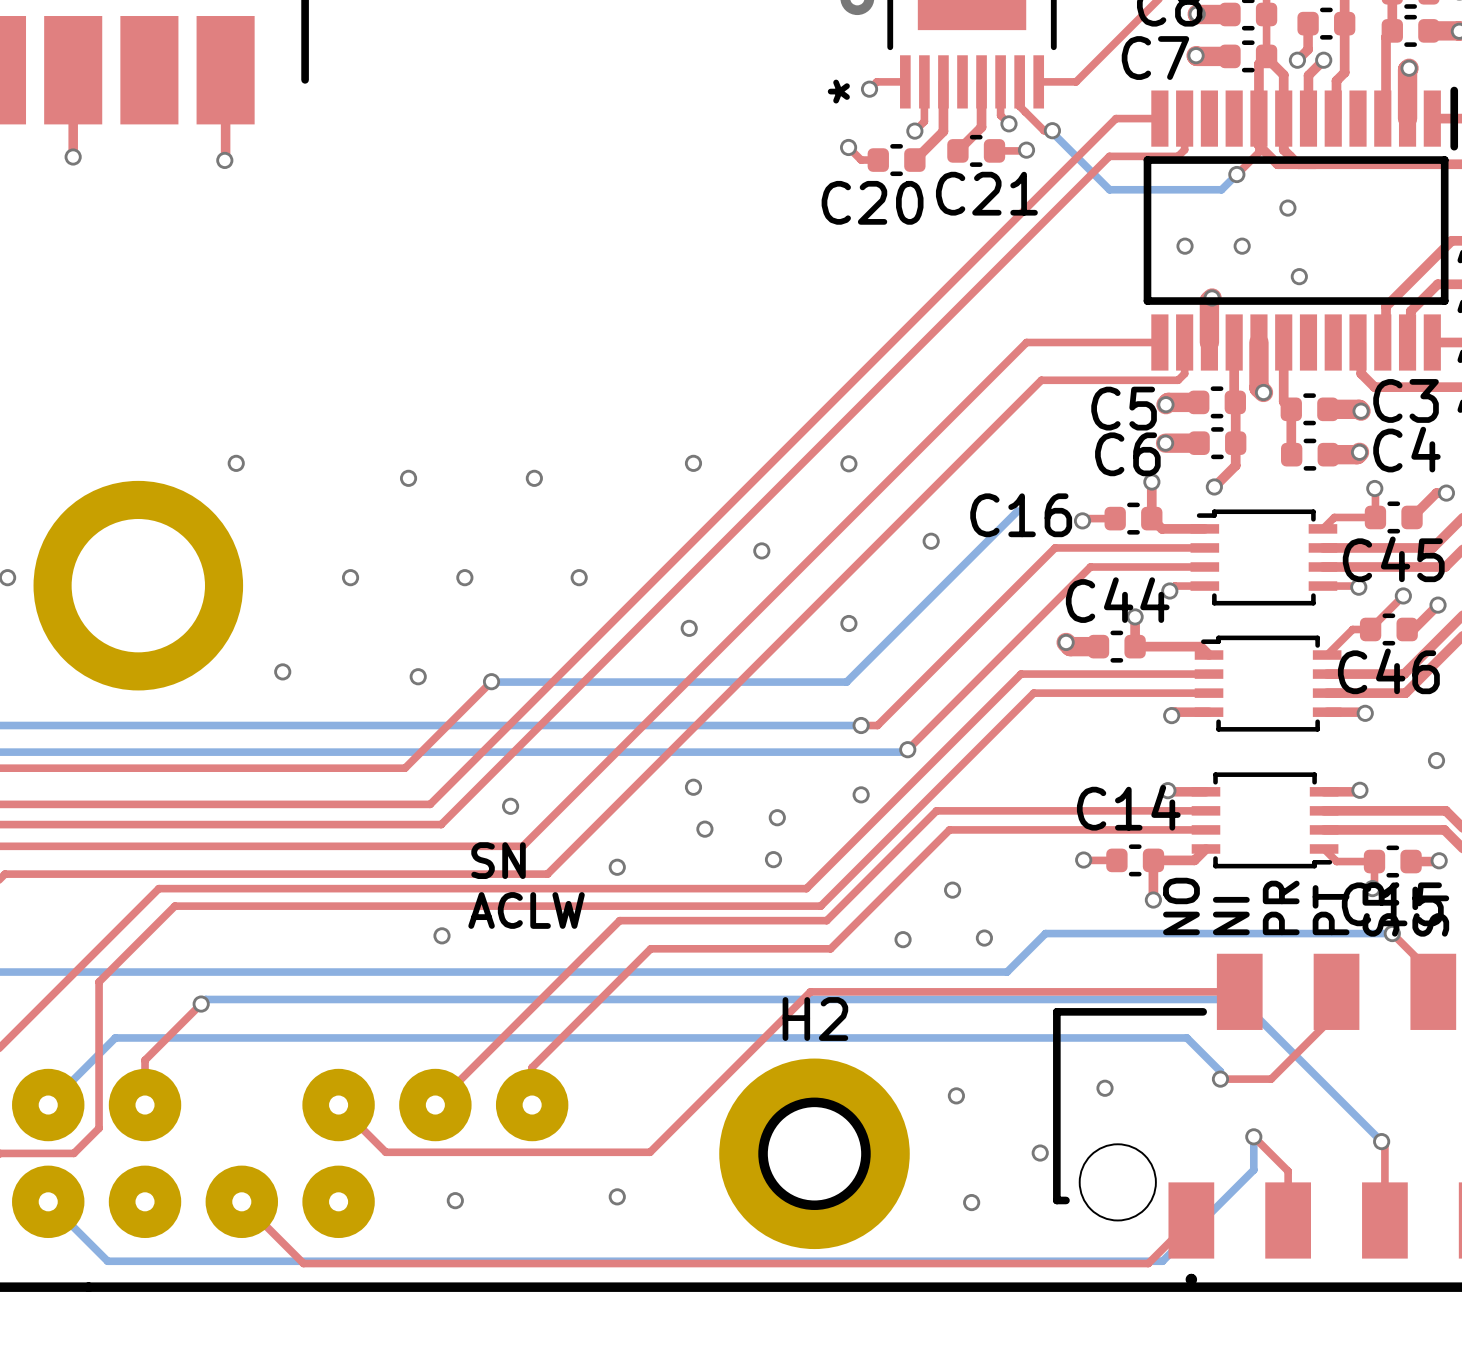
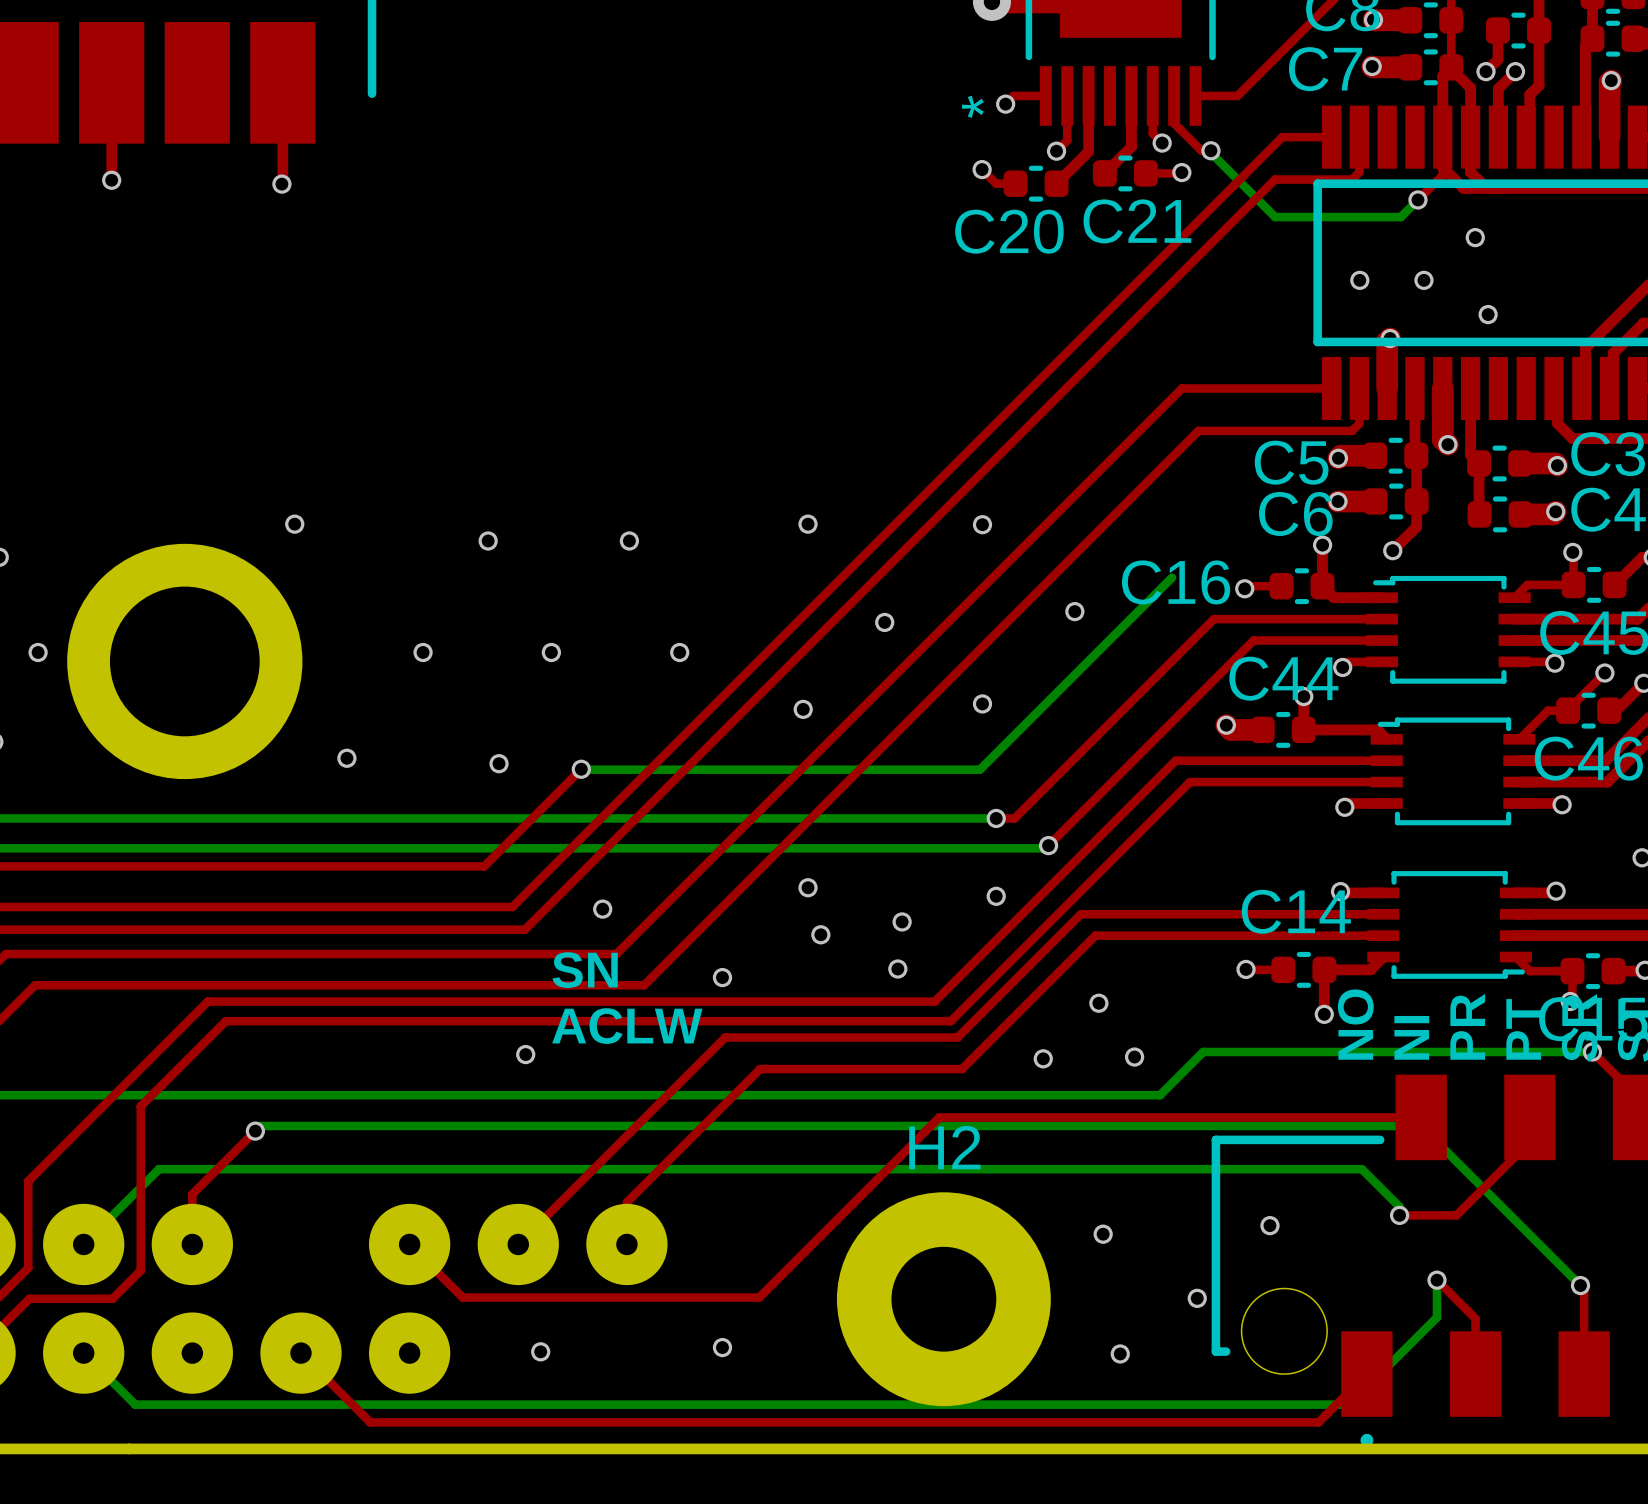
bottom track: (94, 1247) (107, 1261) (1162, 1261) (1176, 1247) -> (135, 1404) (1349, 1404)

